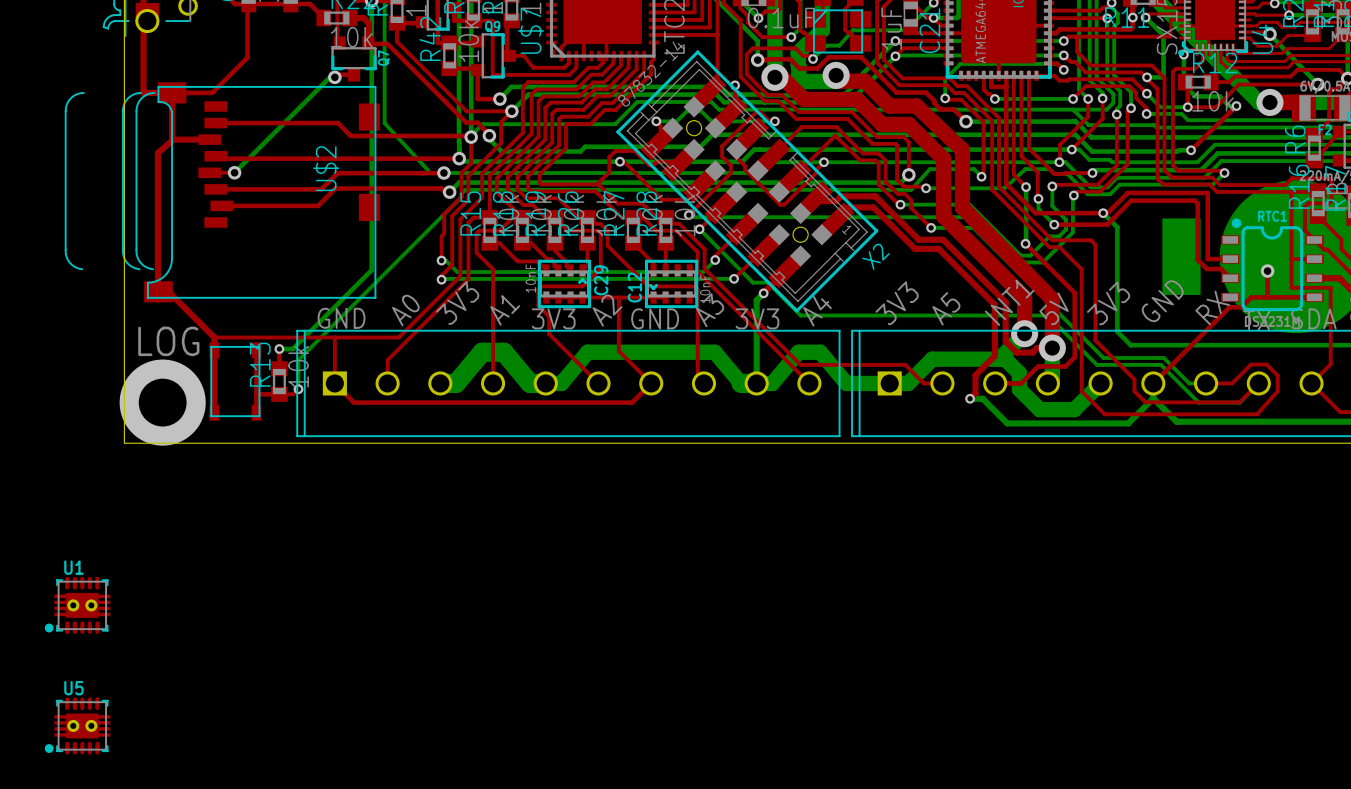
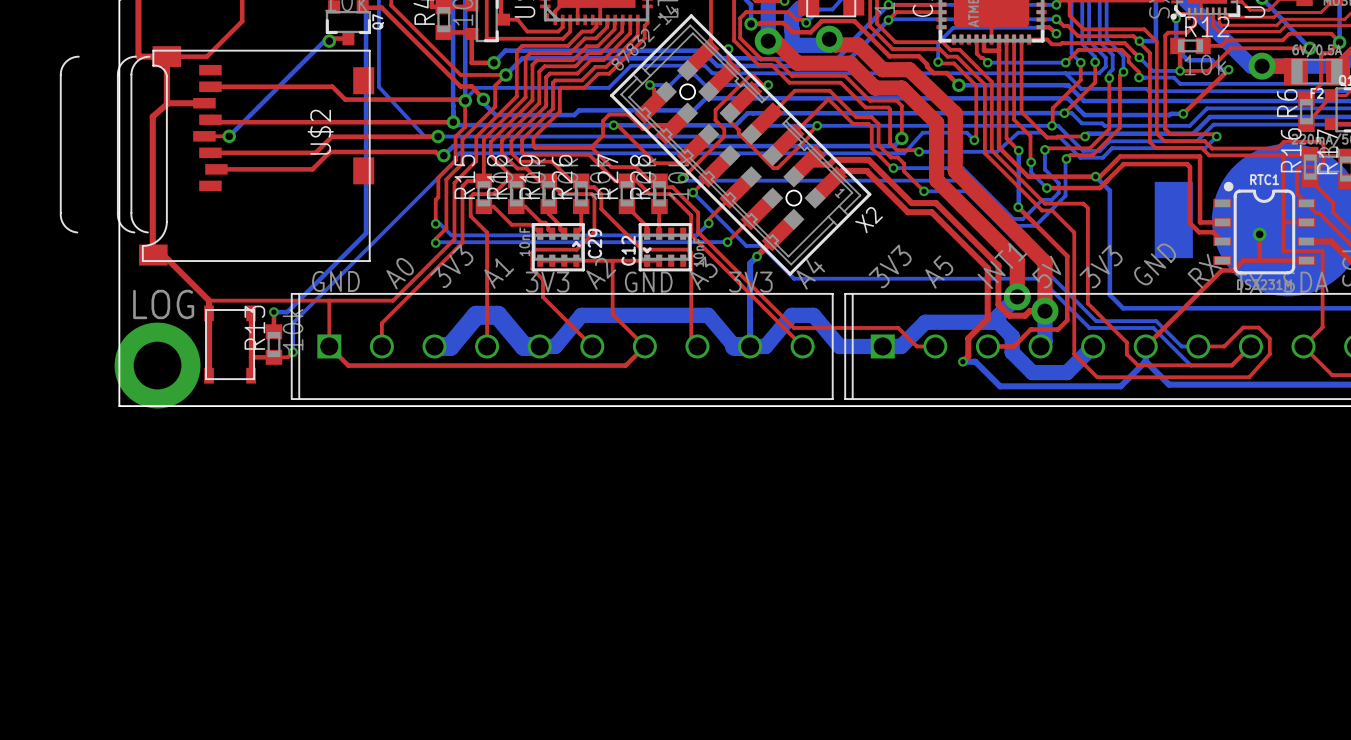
U1: (77, 605) -> none
U5: (77, 725) -> none

